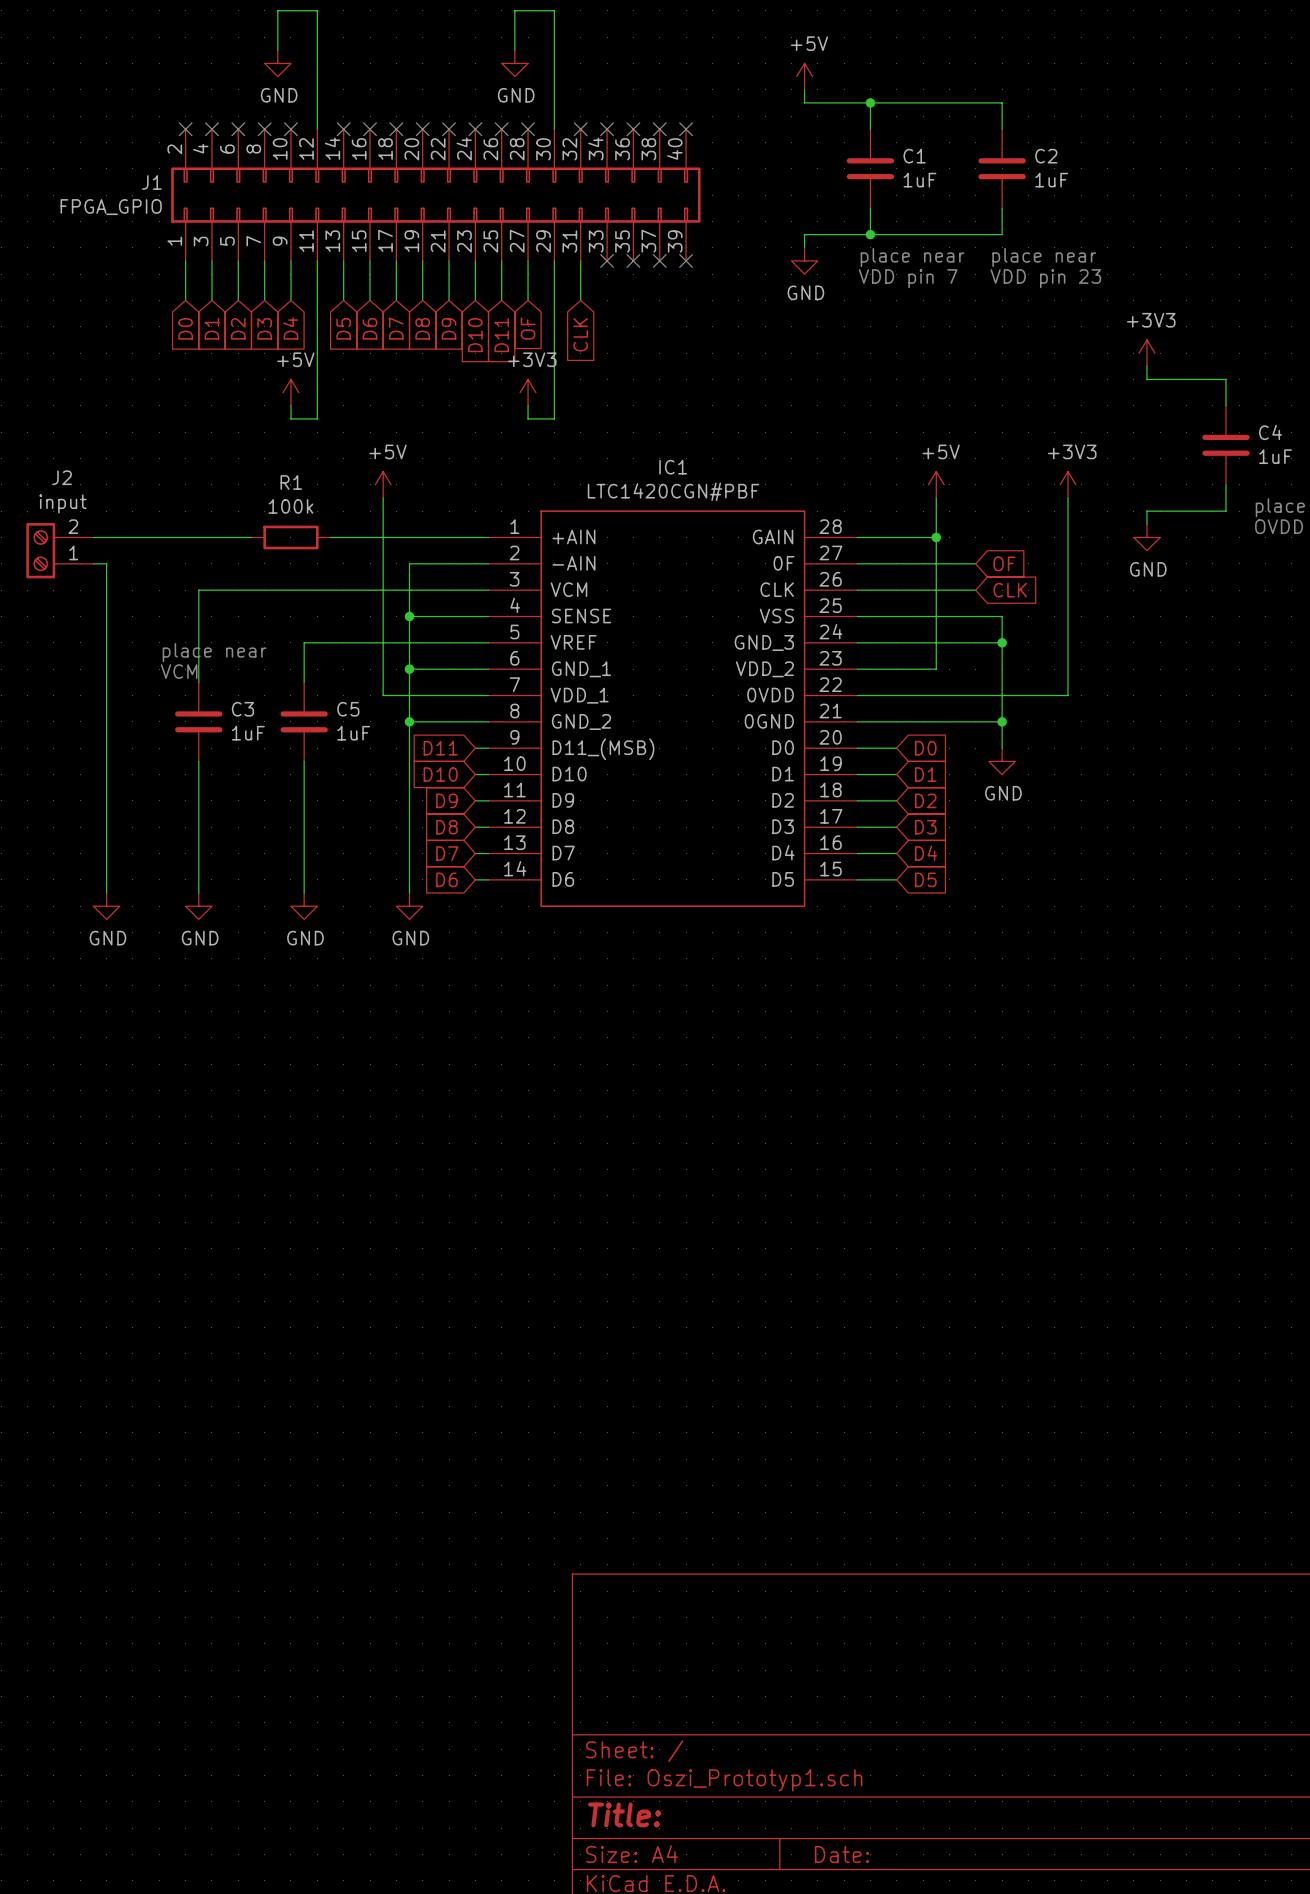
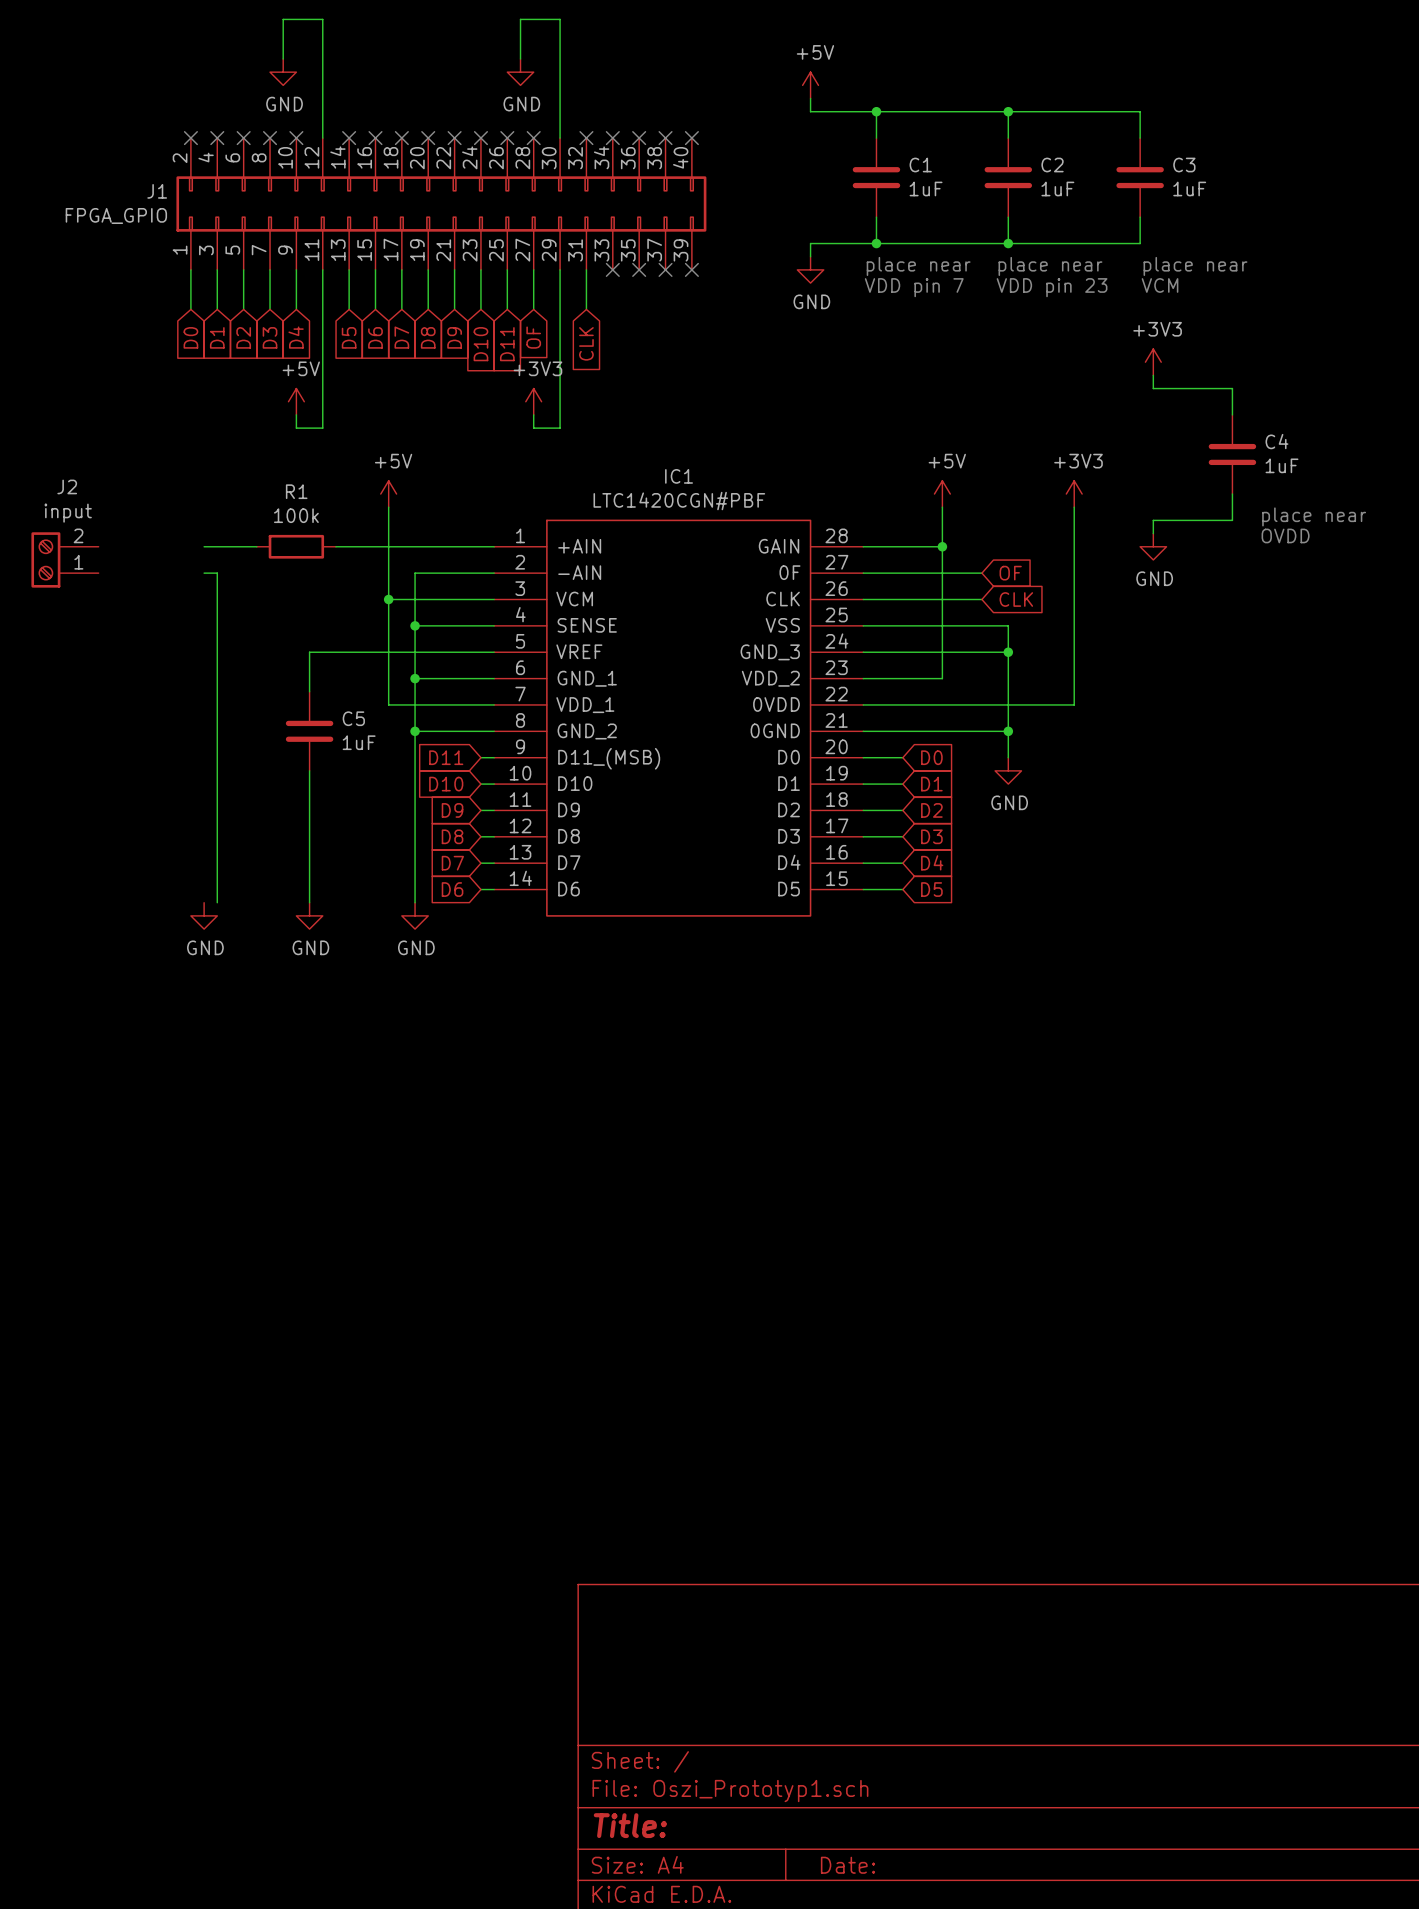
wire: none -> (1008, 111) (1140, 111) (1140, 138)
junction: none -> (1008, 111)
wire: none -> (1140, 217) (1140, 243) (1008, 243)
junction: none -> (1008, 243)
text: none -> place near (1195, 266)
text: none -> VCM (1160, 285)
wire: (93, 537) (198, 537) -> none
wire: (93, 563) (106, 563) (106, 893) -> (204, 573) (217, 573) (217, 902)
wire: (383, 590) (198, 590) (198, 682) -> none
junction: none -> (388, 599)
text: place near (214, 652) -> none
text: VCM (179, 671) -> none
C3 position: (198, 721) -> (1140, 177)
wire: (198, 761) (198, 893) -> none
power symbol: GND (106, 906) -> none

